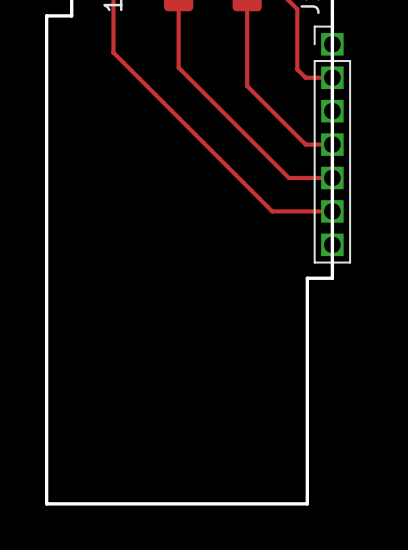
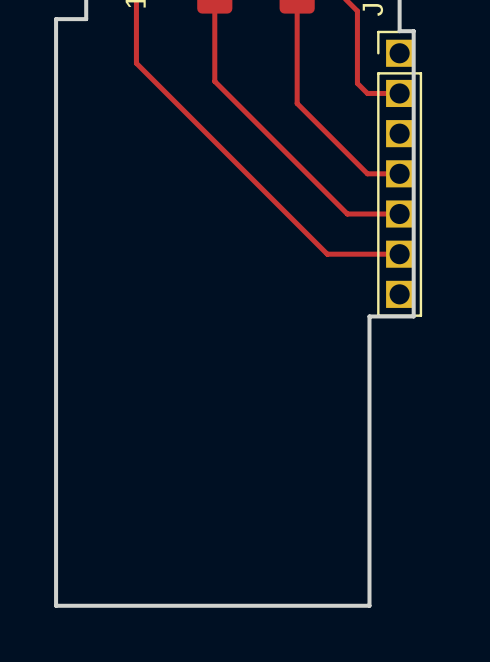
board edge: (332, 25) (332, 278) (307, 278) -> (399, 31) (413, 31) (413, 316) (369, 316) (369, 334)

